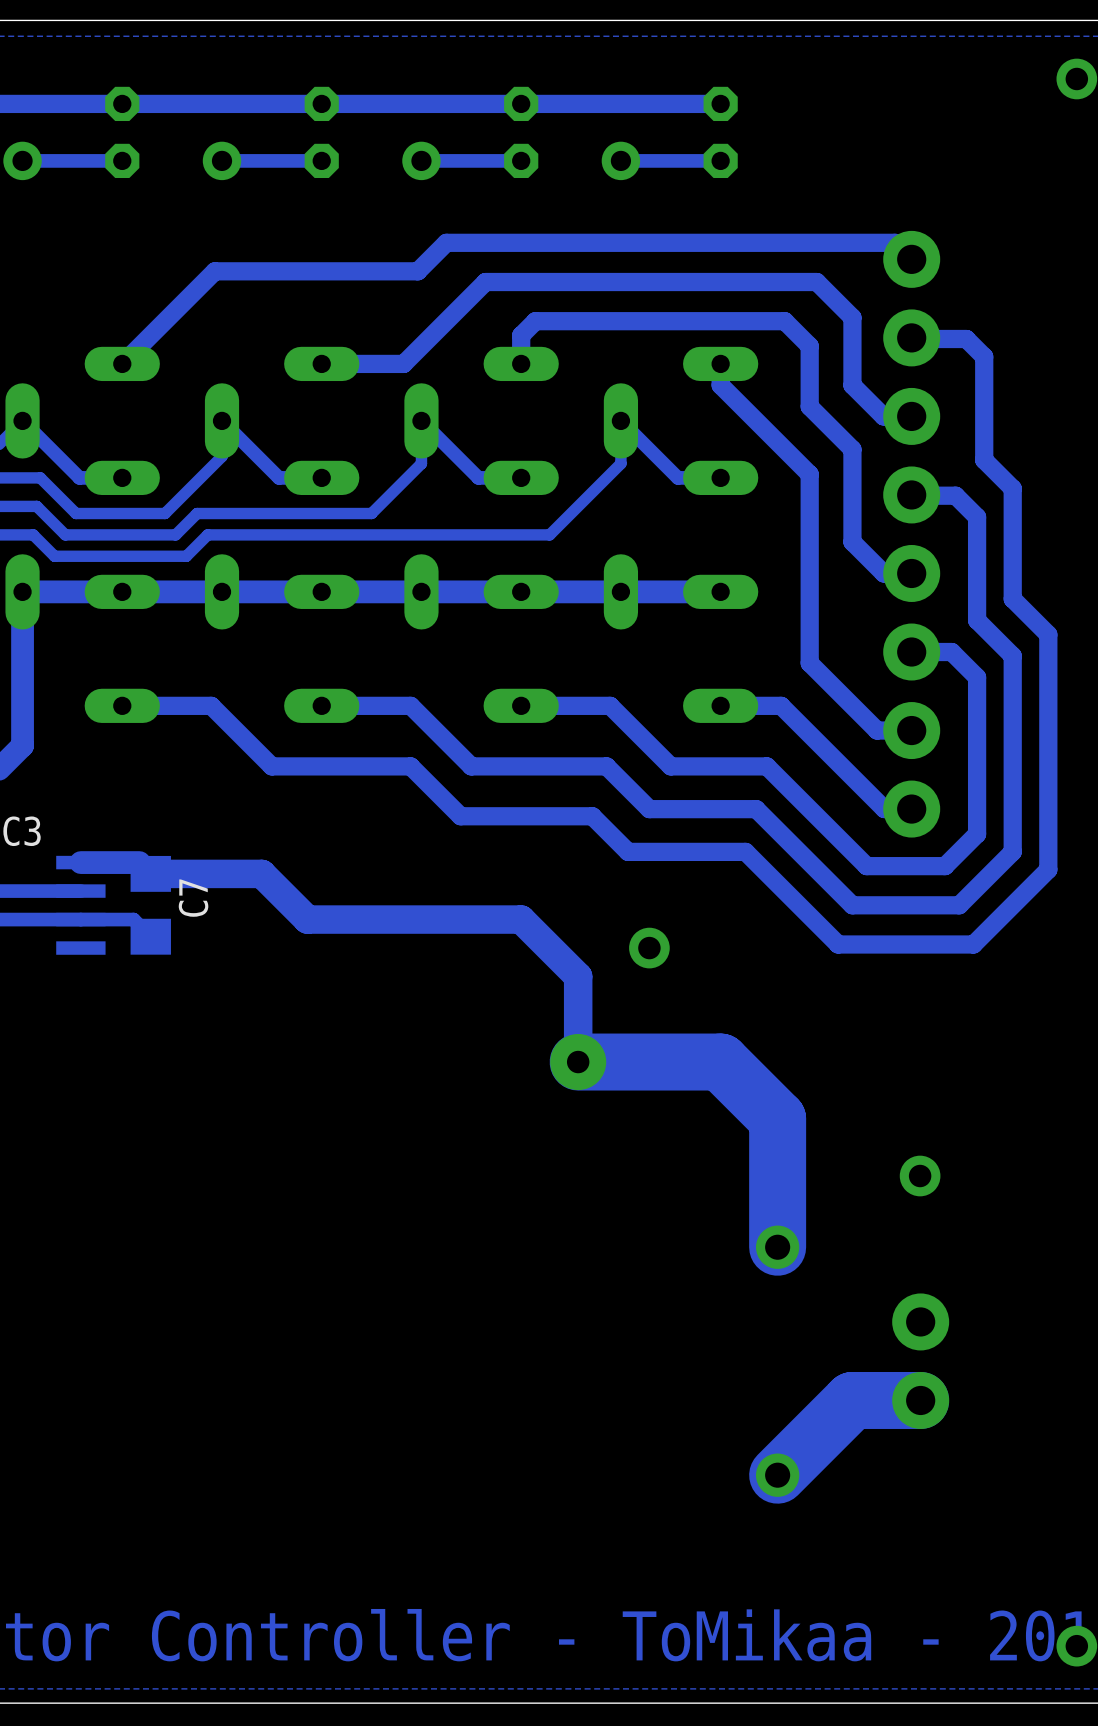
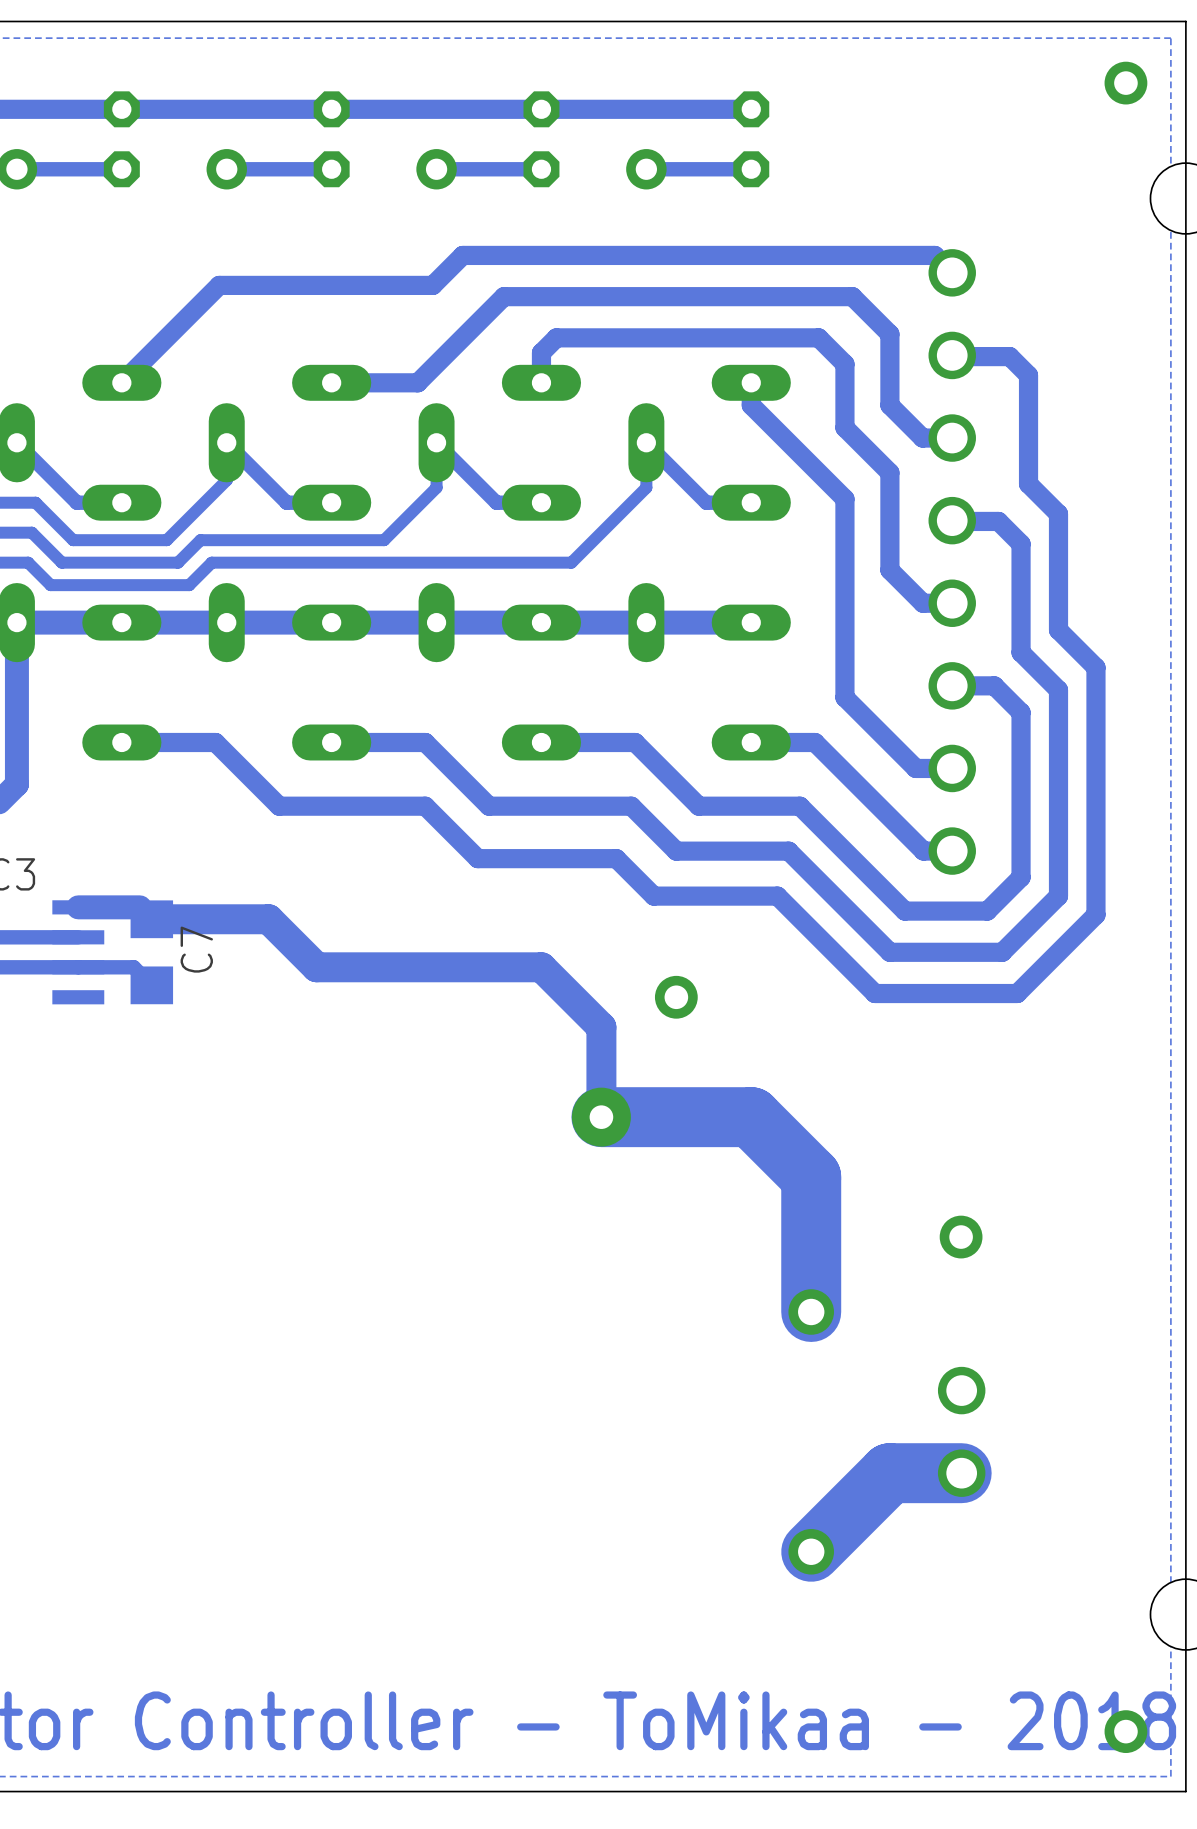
part footprint: [883, 230, 941, 367] -> [928, 249, 976, 380]
part footprint: [883, 387, 941, 524] -> [928, 414, 976, 545]
part footprint: [883, 544, 941, 681] -> [928, 579, 976, 710]
part footprint: [883, 702, 941, 838] -> [928, 744, 976, 875]
part footprint: [892, 1293, 950, 1429] -> [937, 1366, 986, 1497]

